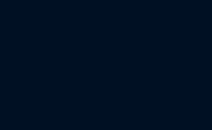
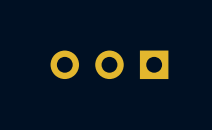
part: none -> (109, 64)

